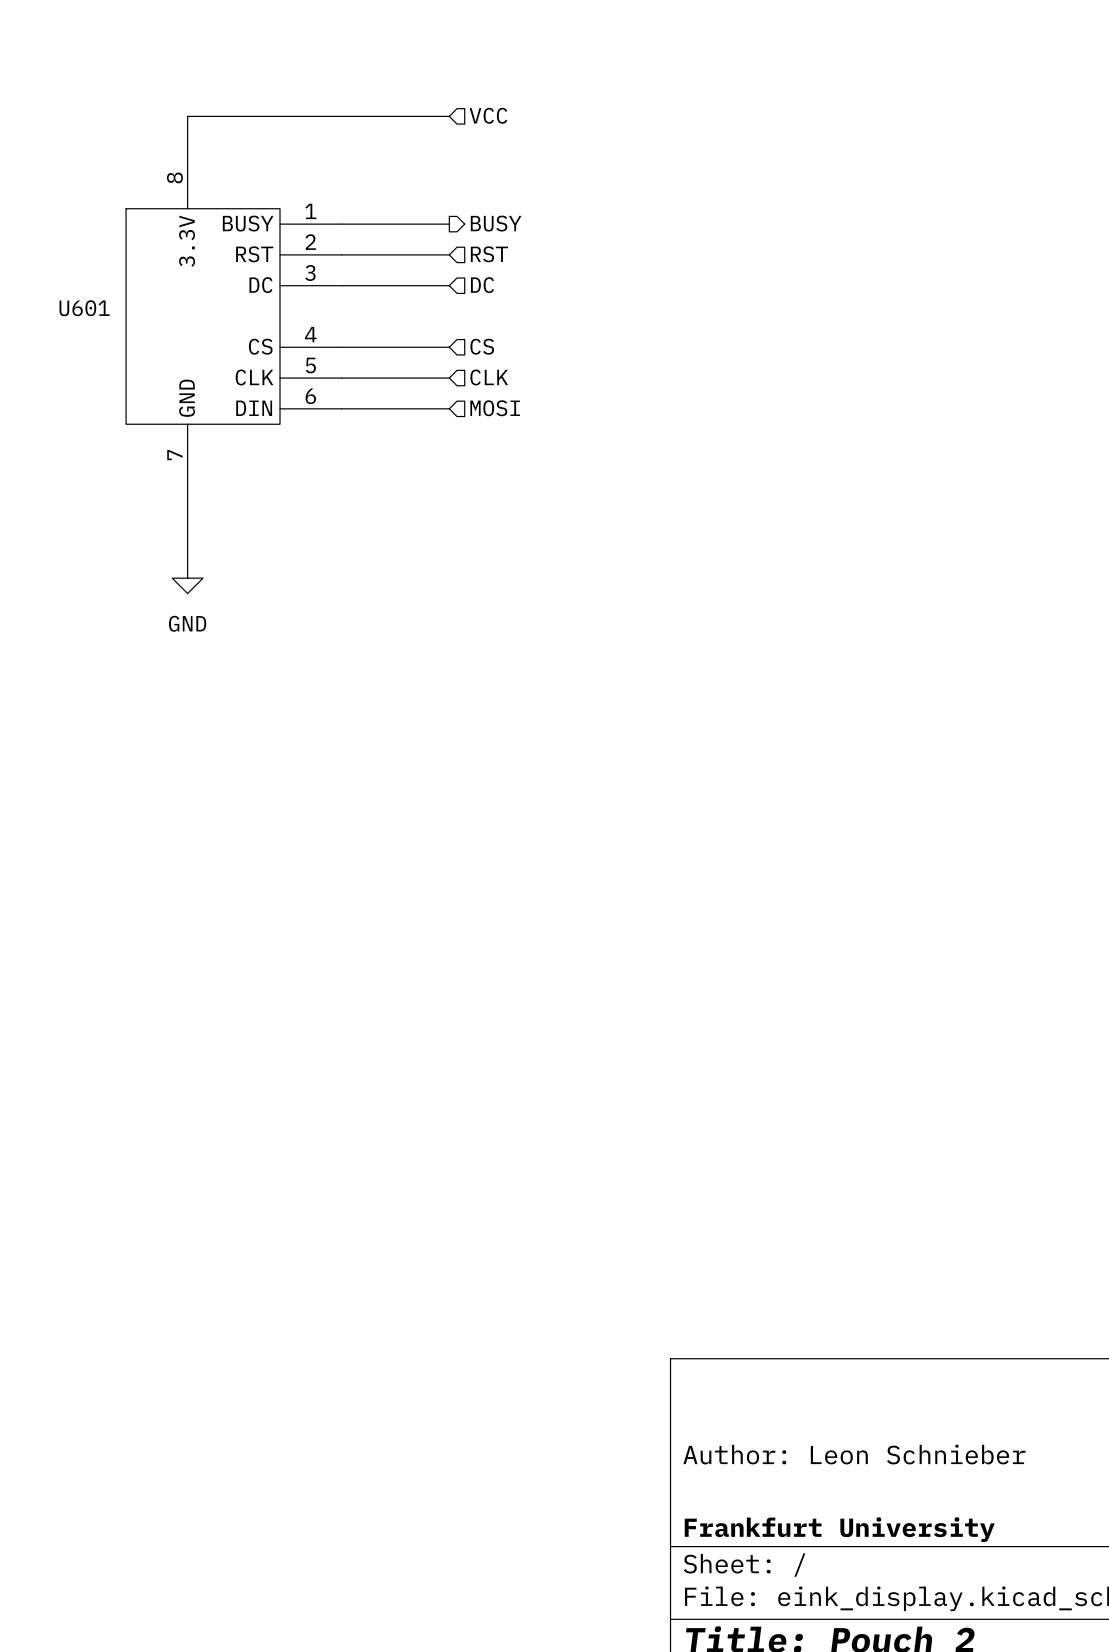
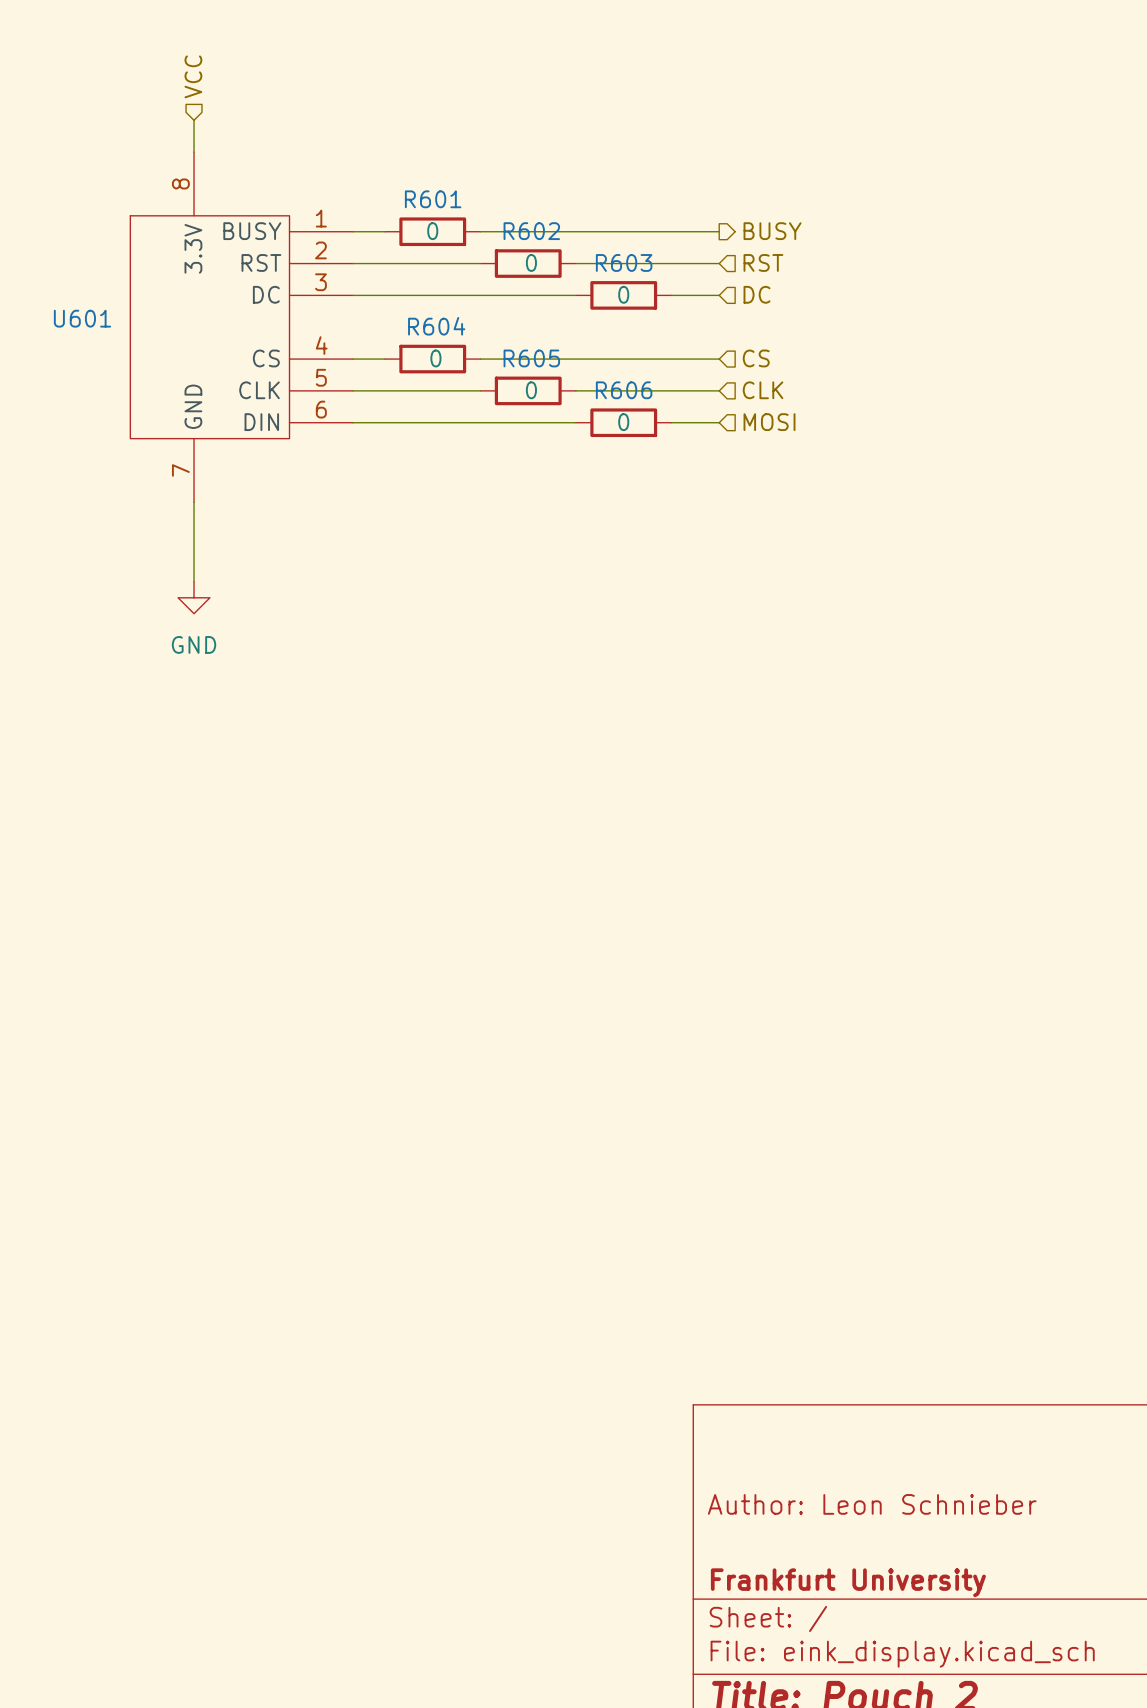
hierarchical label rotation: 0° (488, 115) -> 90° counterclockwise (193, 76)
hierarchical label position: VCC (488, 115) -> VCC (193, 76)
wire: (187, 116) (449, 116) -> none
hierarchical label position: BUSY (496, 223) -> BUSY (772, 231)
wire: (372, 224) (449, 224) -> none
R601: none -> 0 (432, 231)
wire: none -> (480, 231) (719, 231)
wire: none -> (464, 263) (480, 263)
hierarchical label position: RST (489, 254) -> RST (763, 262)
R602: none -> 0 (528, 263)
wire: none -> (575, 263) (719, 263)
wire: none -> (464, 295) (575, 295)
hierarchical label position: DC (482, 285) -> DC (756, 294)
R603: none -> 0 (623, 295)
wire: none -> (671, 295) (719, 295)
hierarchical label position: CS (482, 346) -> CS (756, 358)
wire: (372, 347) (449, 347) -> none
R604: none -> 0 (432, 359)
wire: none -> (480, 359) (719, 359)
hierarchical label position: CLK (489, 377) -> CLK (763, 390)
wire: none -> (464, 390) (480, 390)
R605: none -> 0 (528, 390)
wire: none -> (575, 390) (719, 390)
wire: none -> (464, 422) (575, 422)
hierarchical label position: MOSI (495, 408) -> MOSI (769, 422)
R606: none -> 0 (623, 422)
wire: none -> (671, 422) (719, 422)

